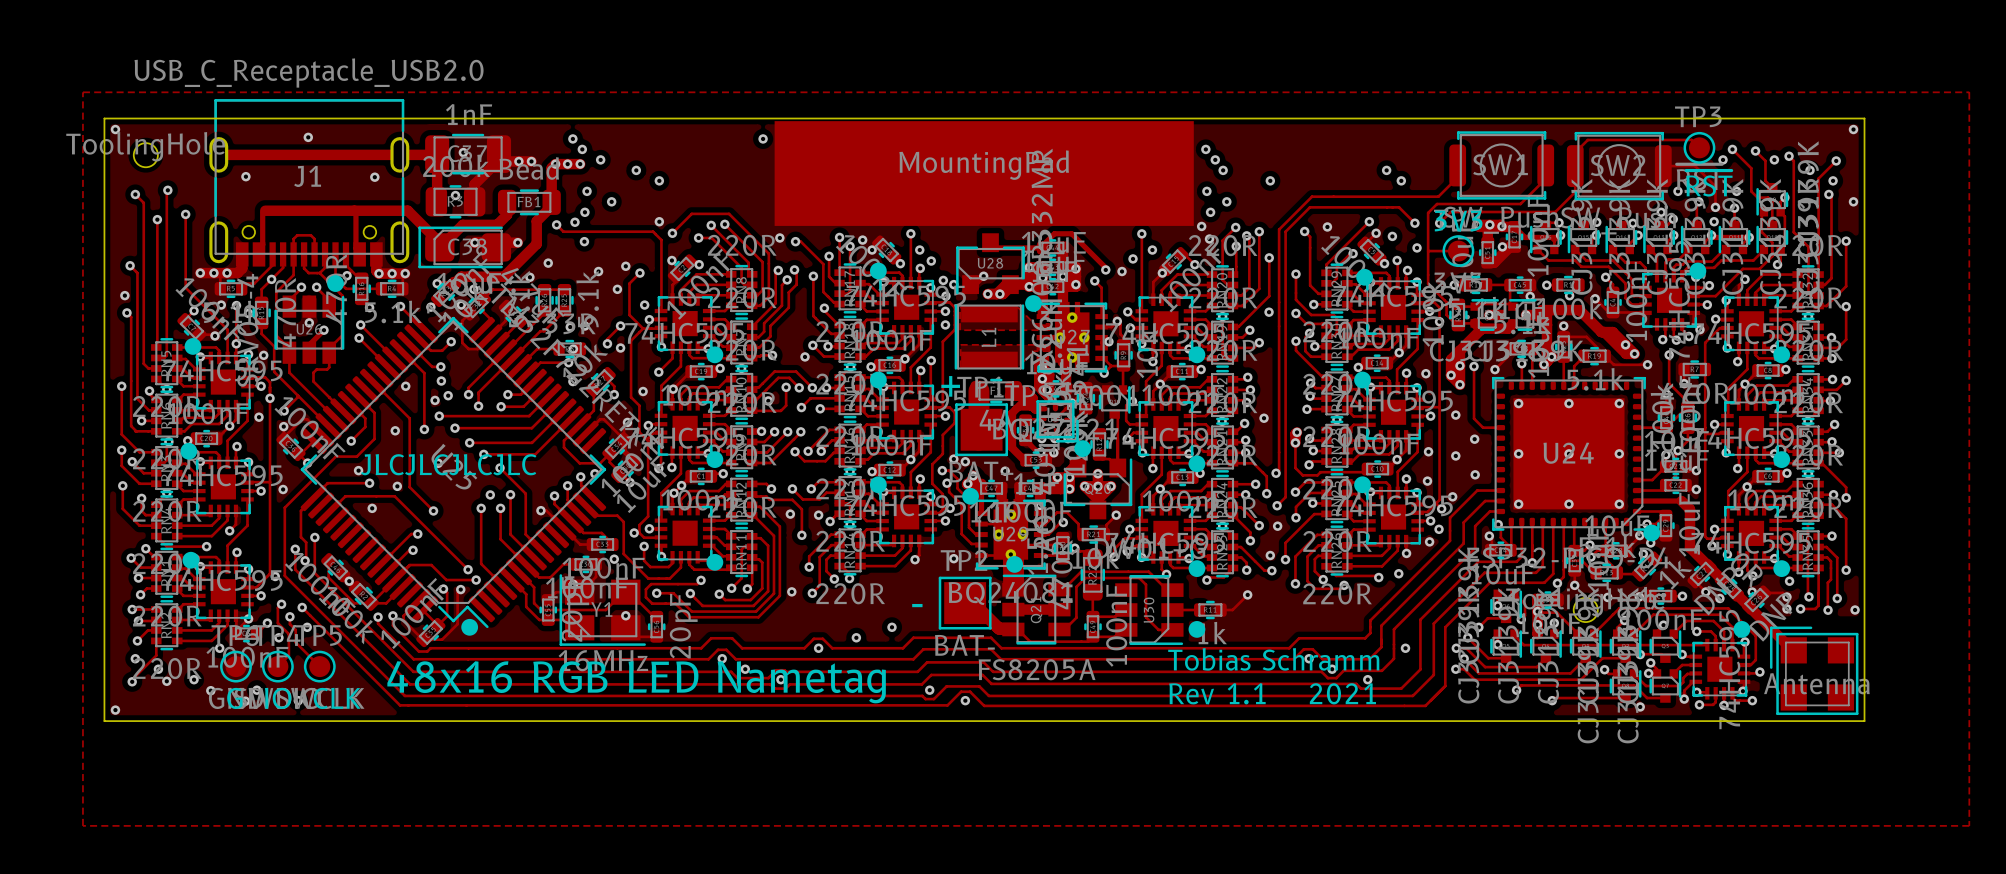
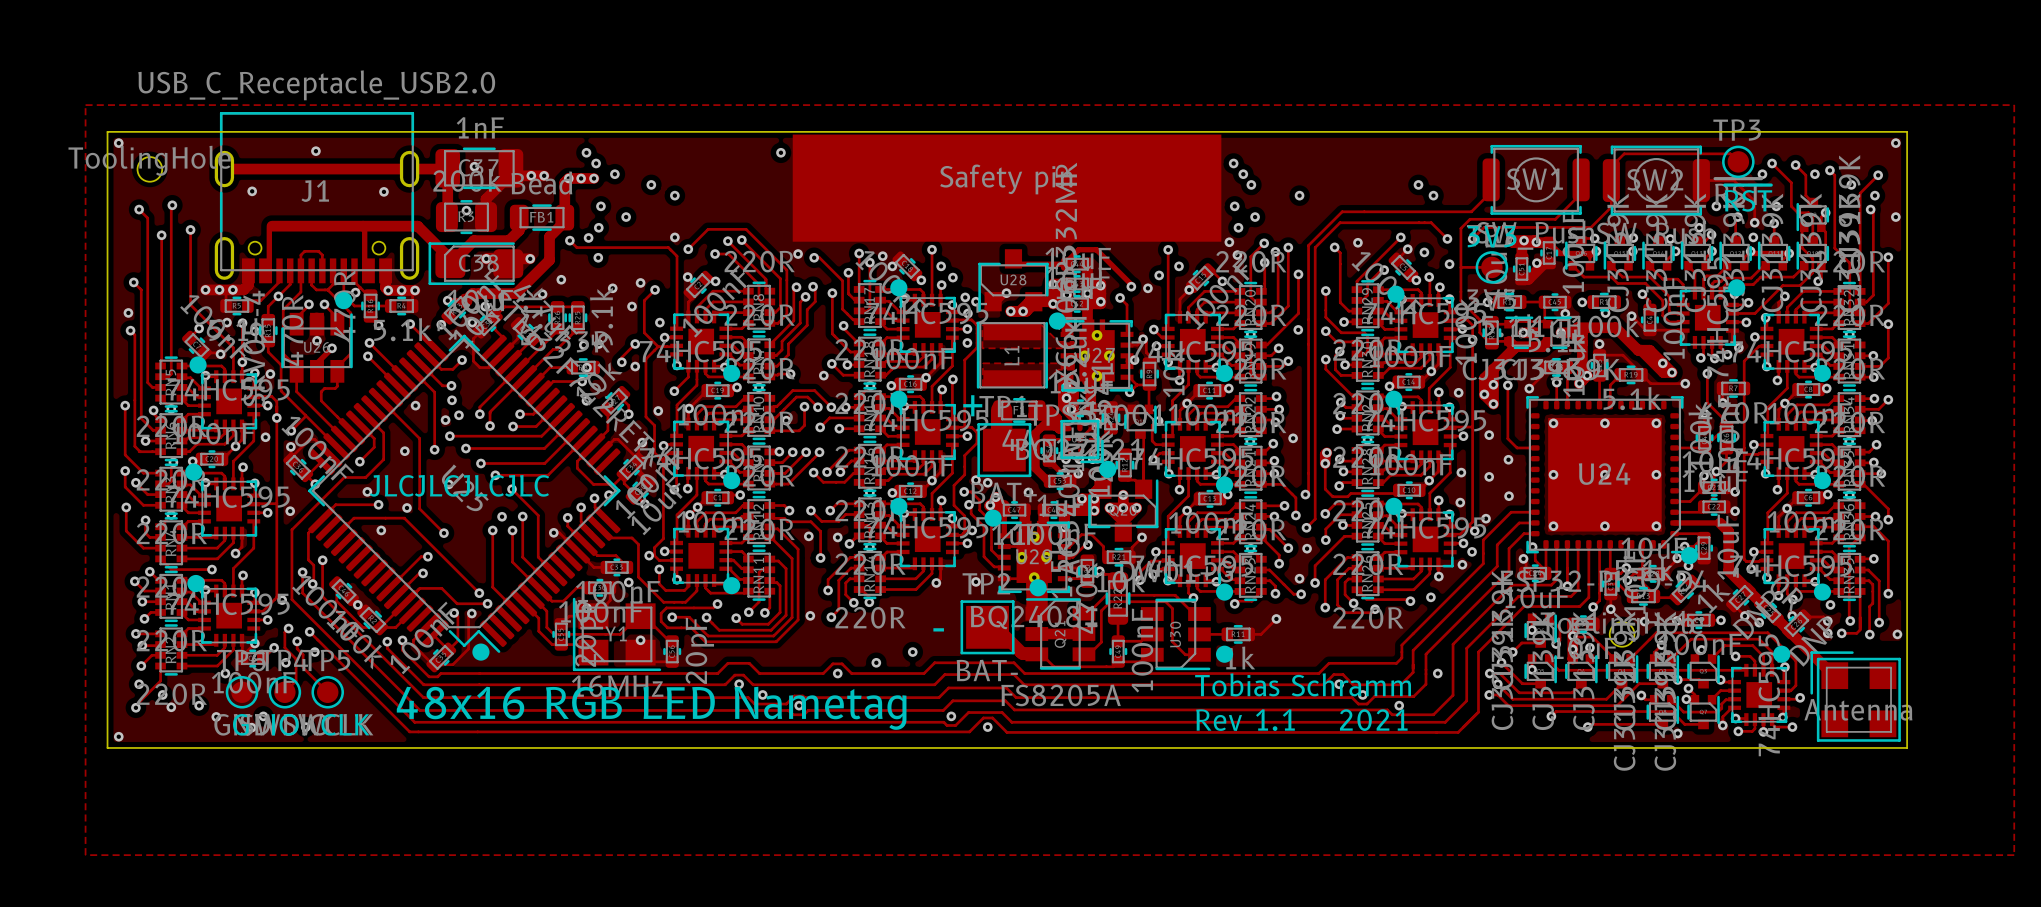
part value: MountingPad (984, 165) -> Safety pin (1006, 179)

